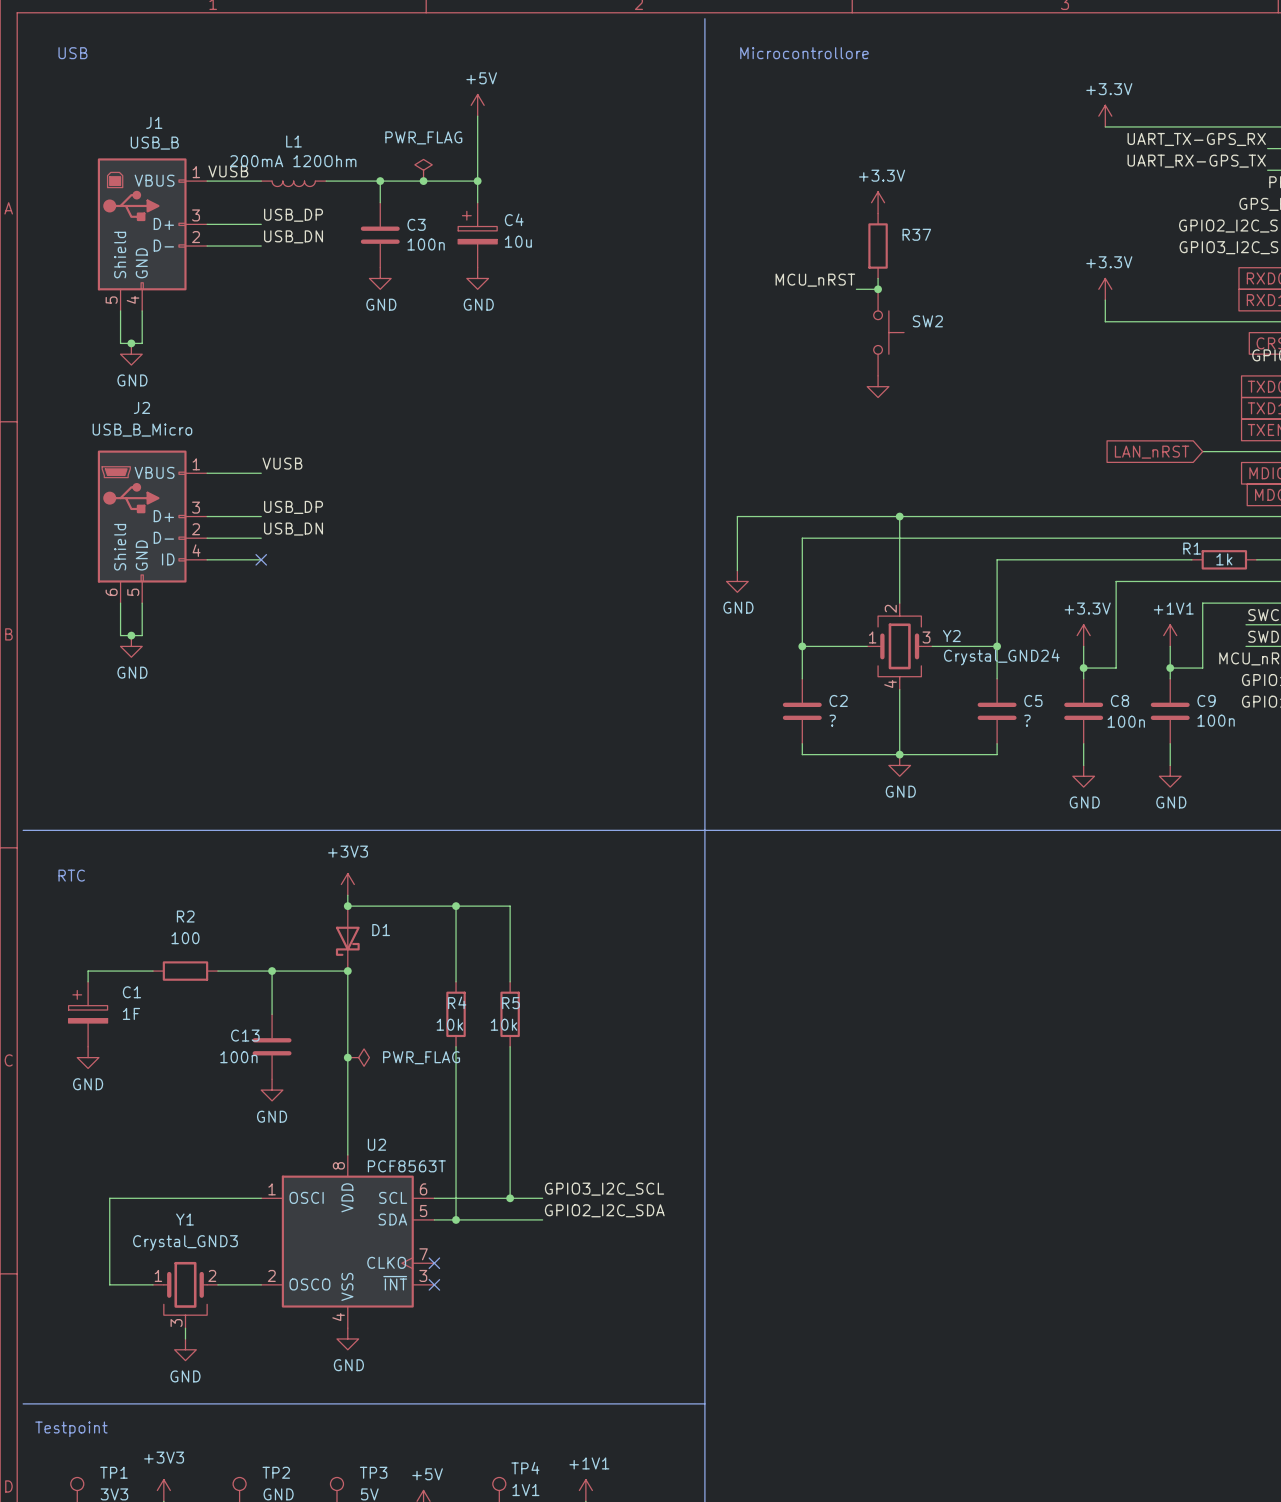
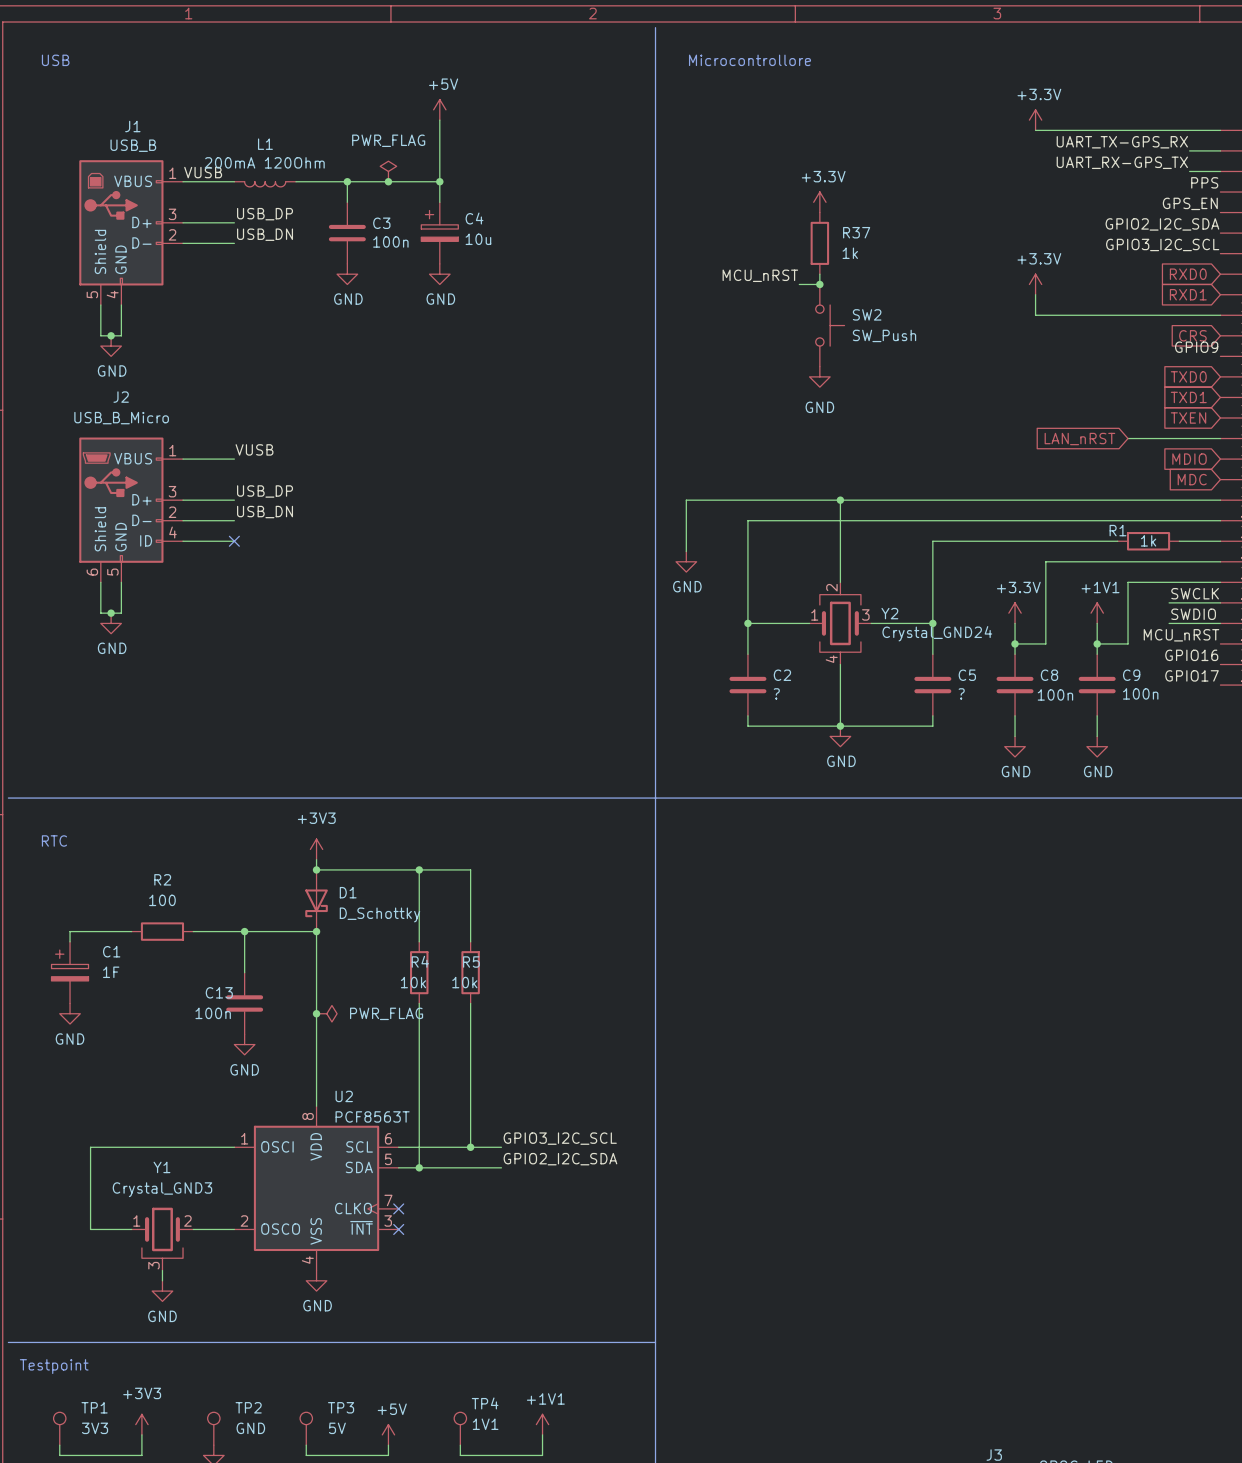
R37 value: none -> 1k (850, 253)
SW2 value: none -> SW_Push (884, 335)
power symbol text: none -> GND (819, 407)
D1 value: none -> D_Schottky (379, 914)

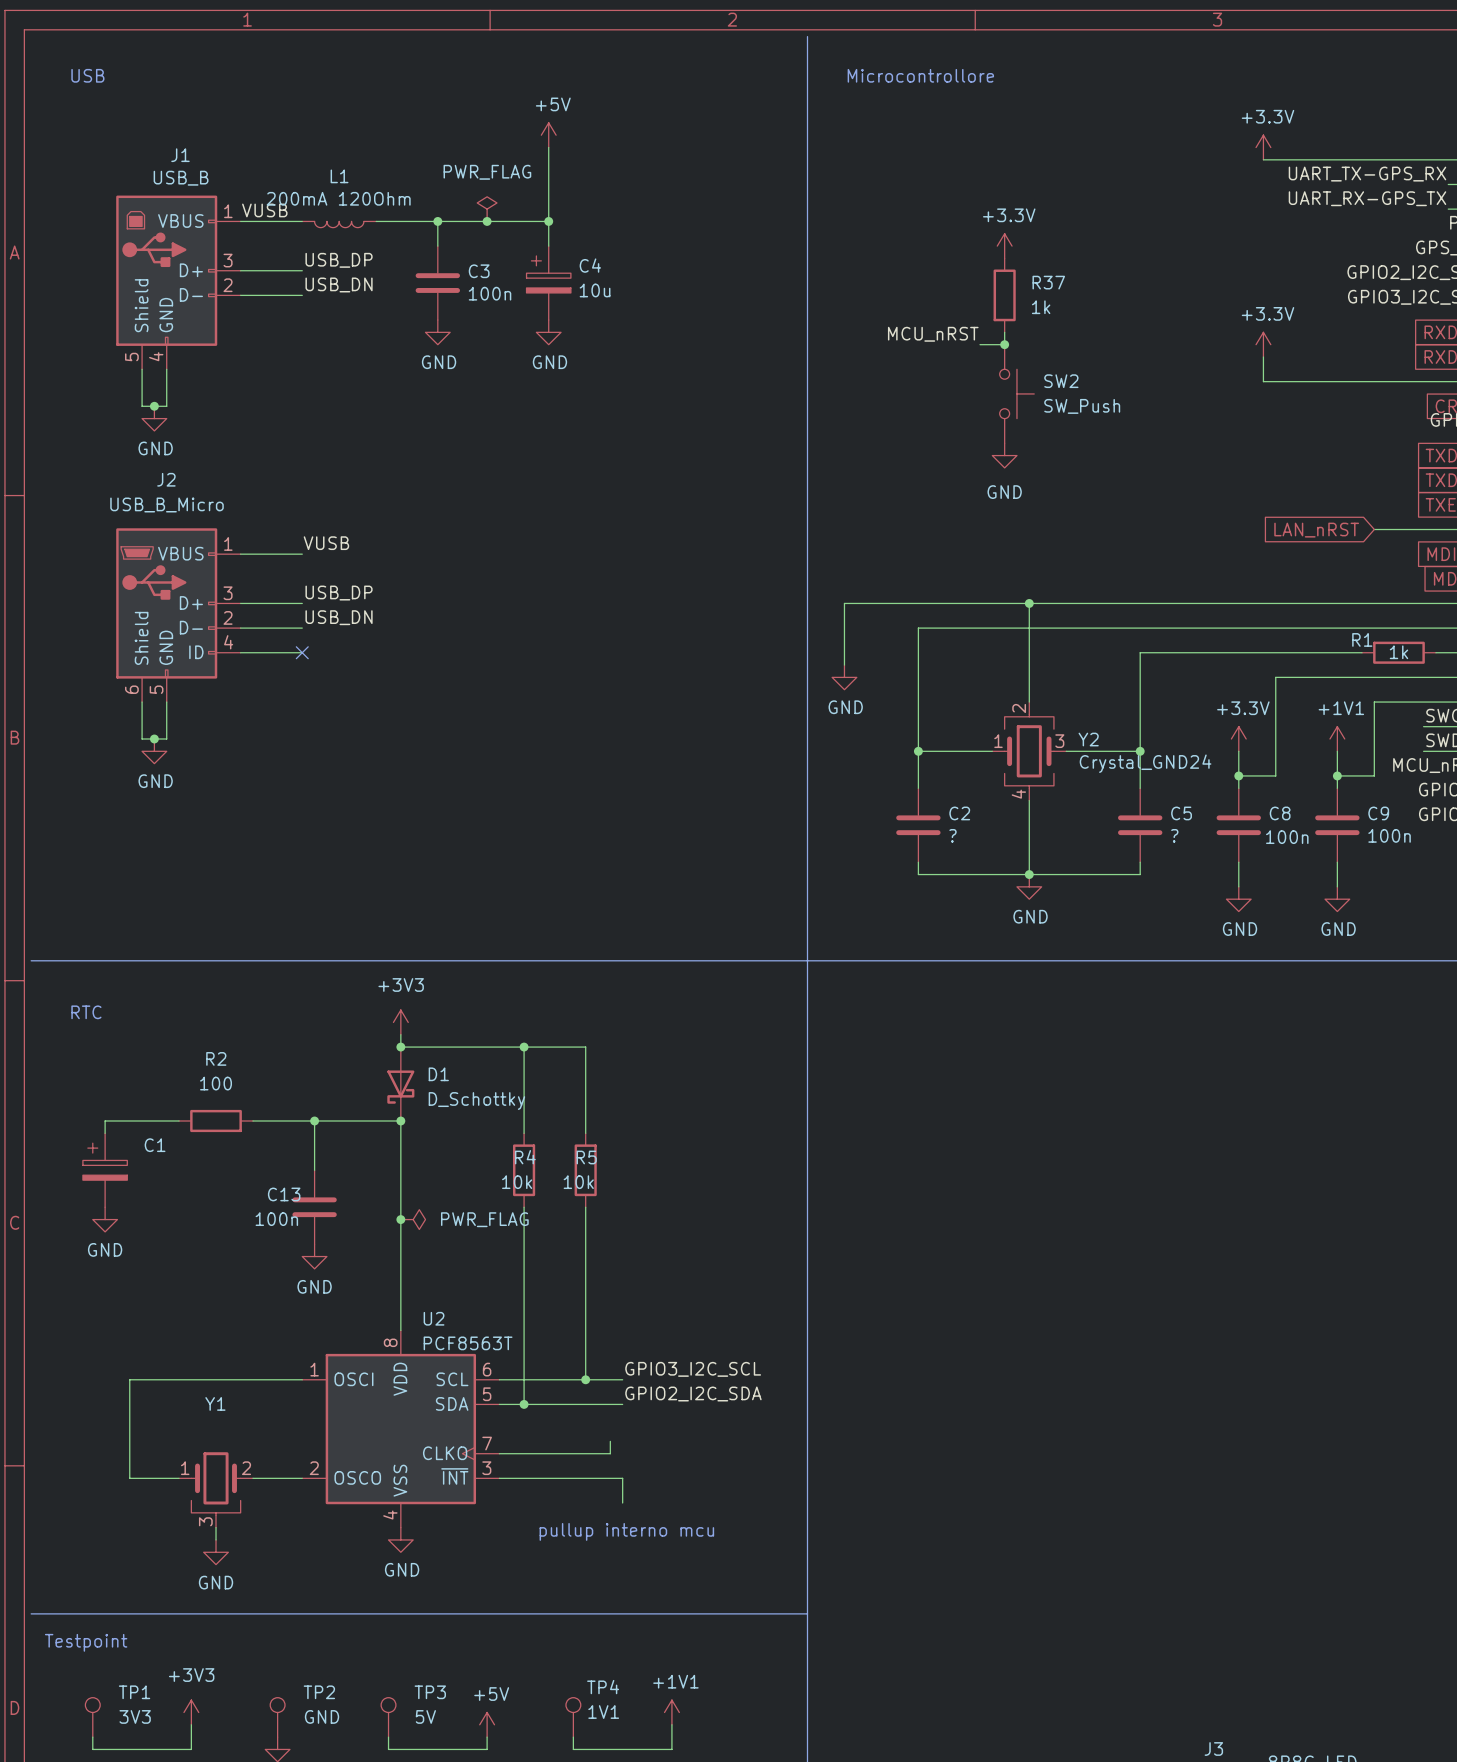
C1 value: 1F (111, 972) -> none
Y1 value: Crystal_GND3 (162, 1189) -> none
wire: none -> (610, 1441) (610, 1453) (499, 1453)
no-connect mark: (398, 1208) -> none
wire: none -> (499, 1478) (622, 1478) (622, 1502)
no-connect mark: (398, 1229) -> none
text: none -> pullup interno mcu (626, 1531)

